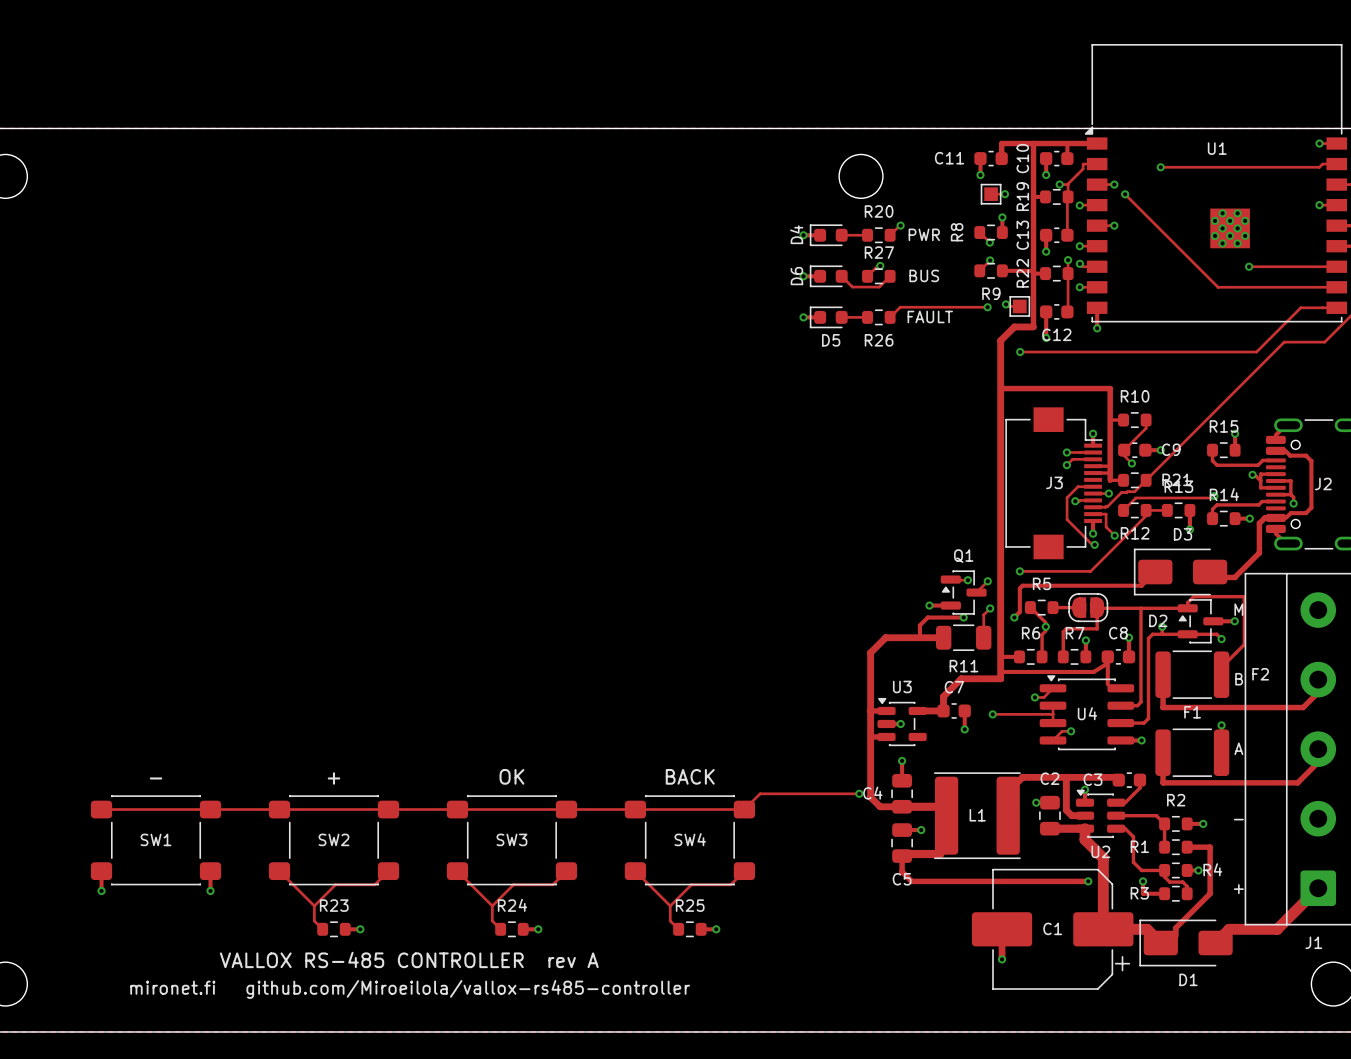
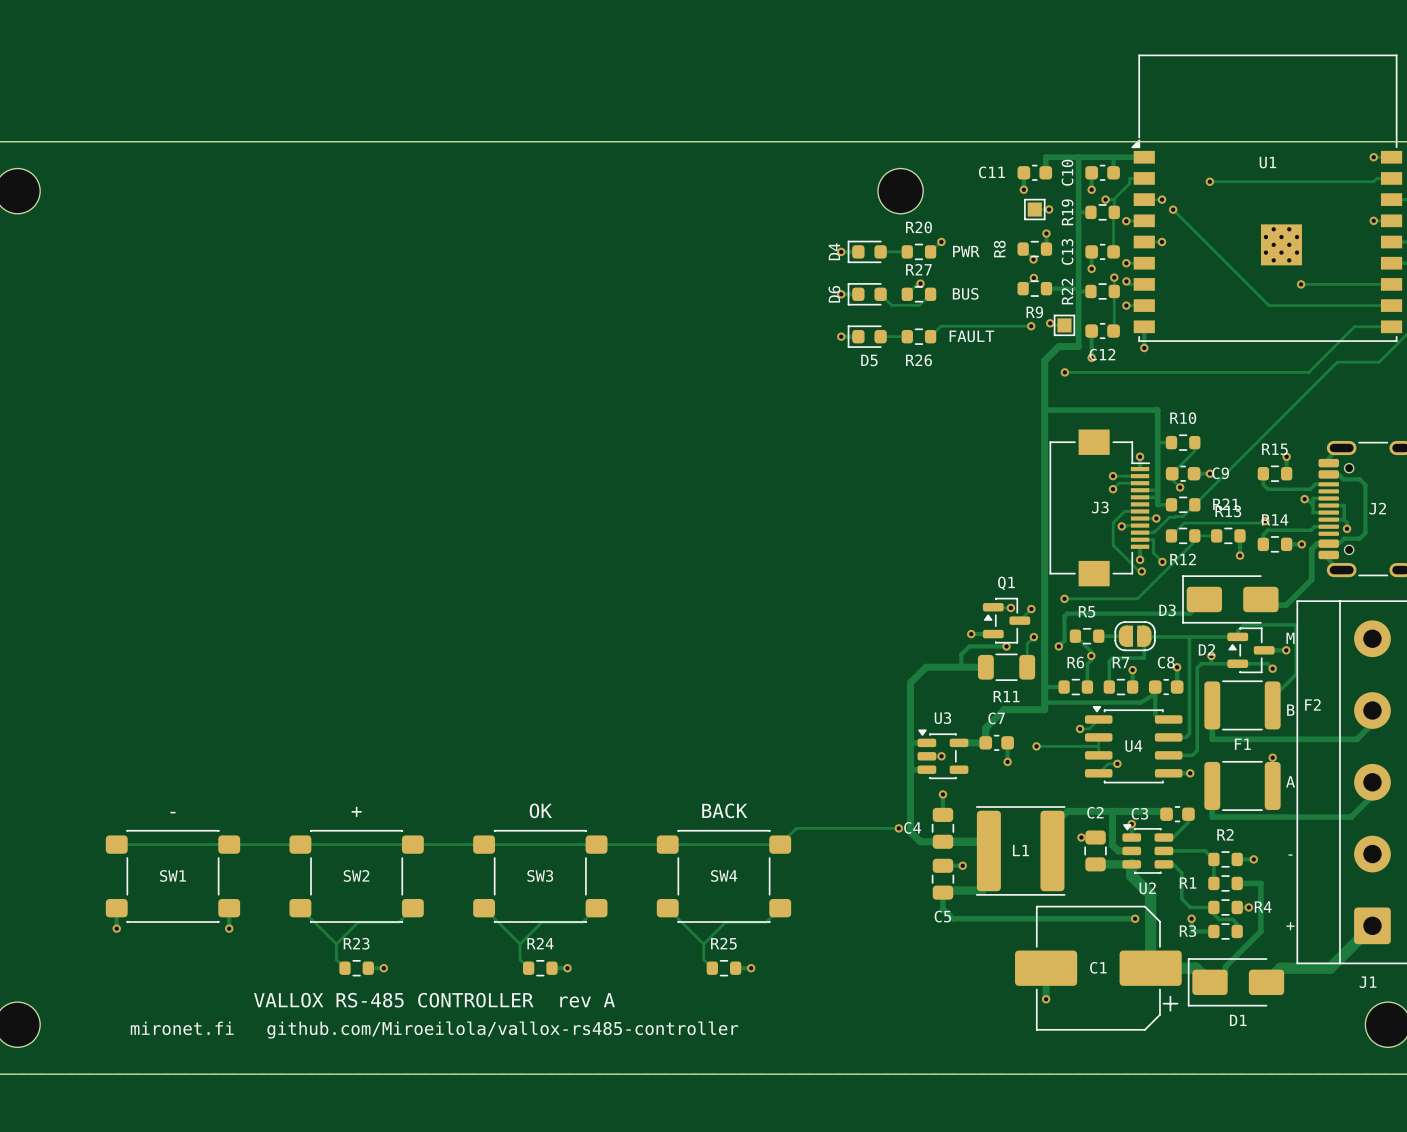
D3 name position: D3 (1183, 534) -> D3 (1167, 610)

